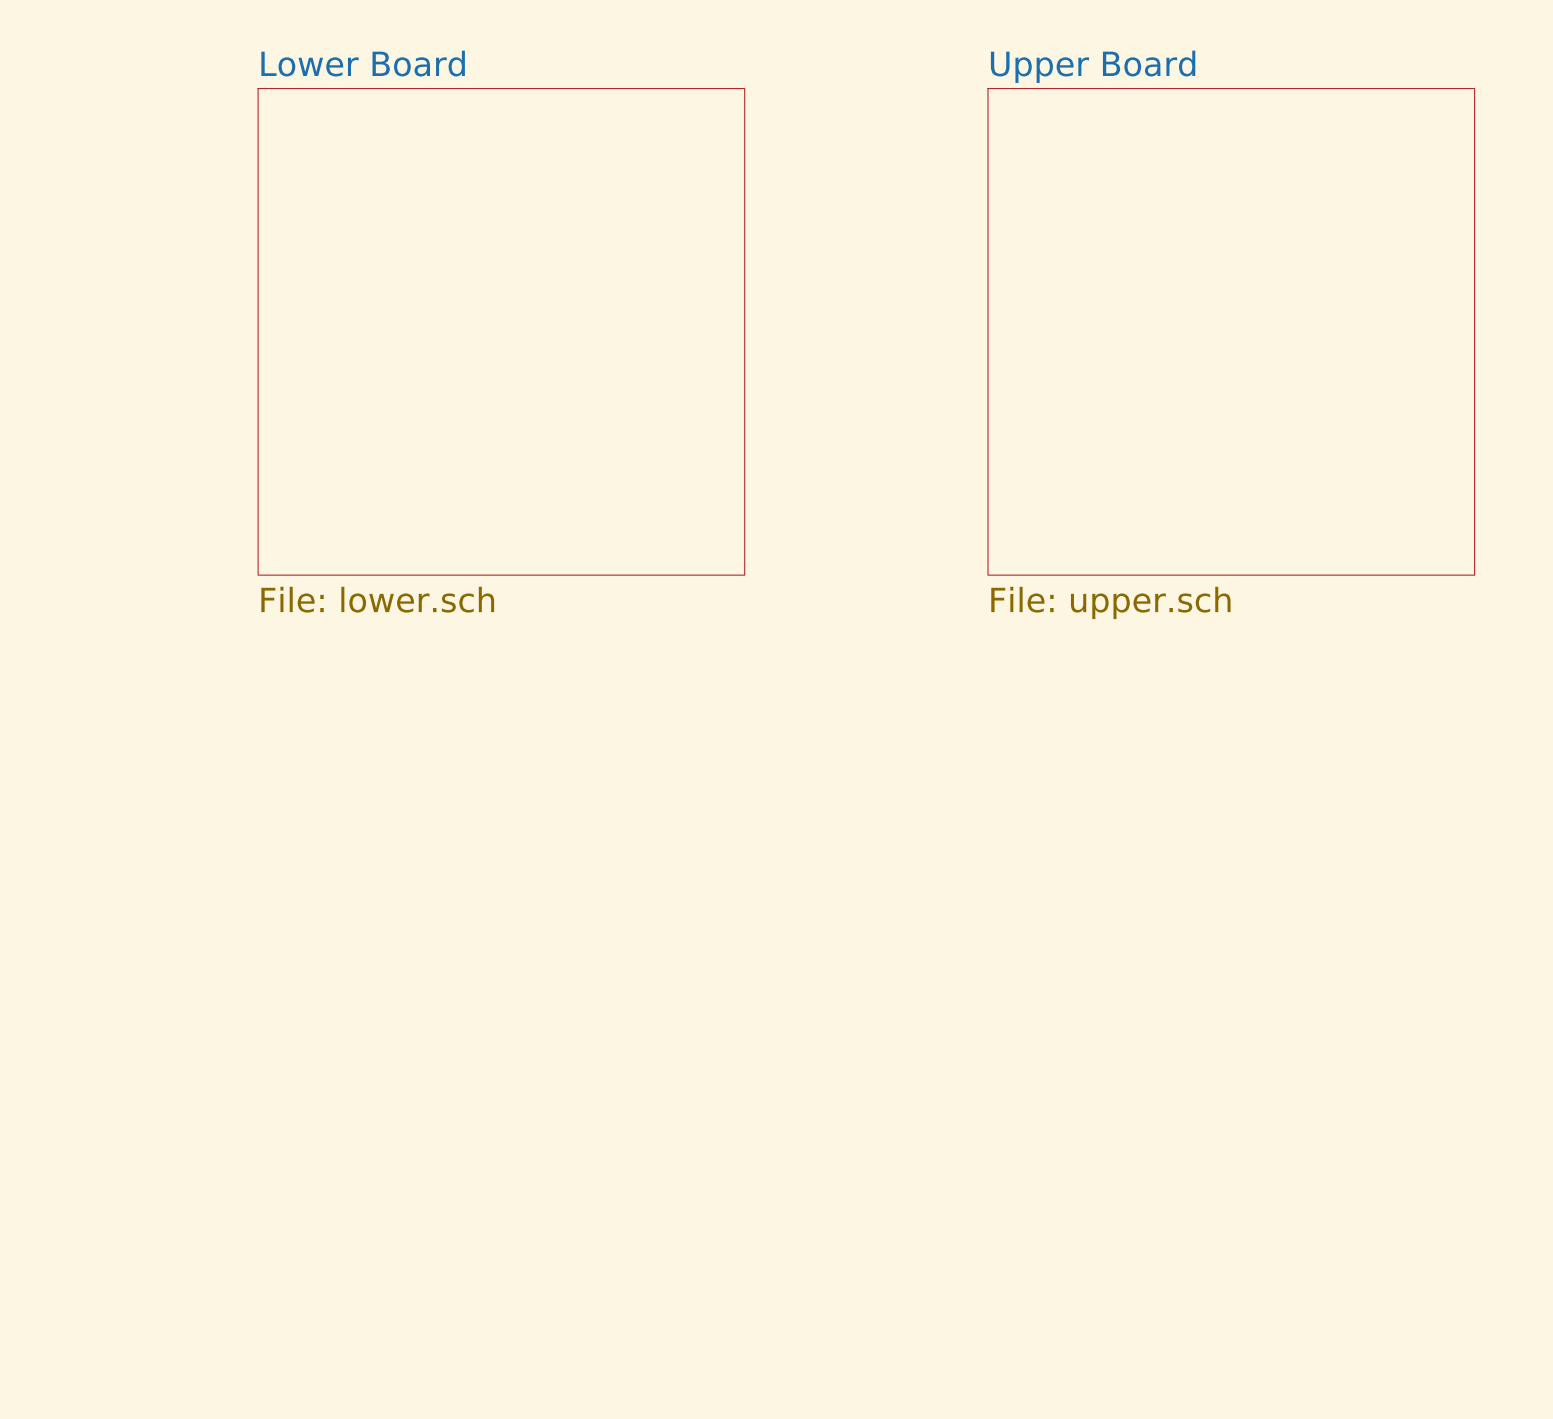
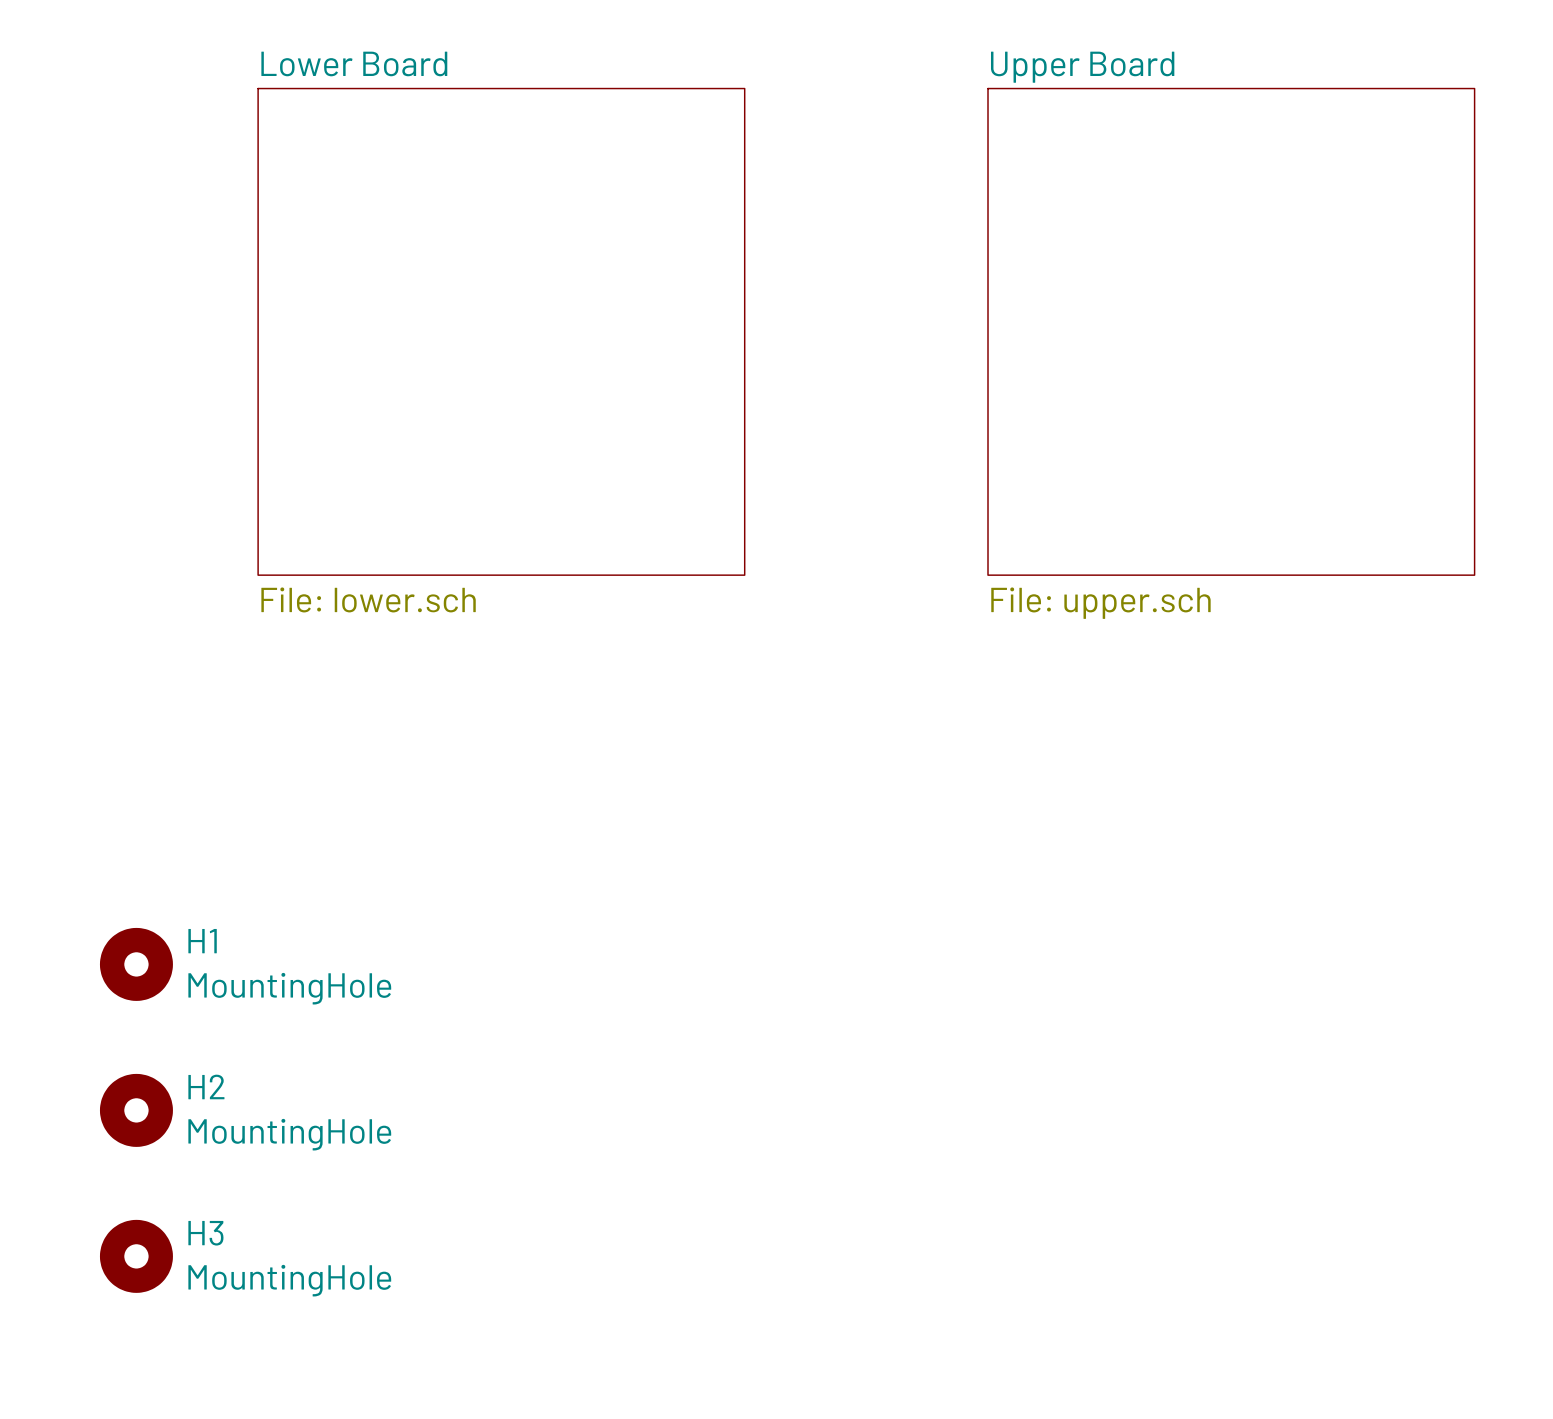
H1: none -> MountingHole (136, 964)
H2: none -> MountingHole (136, 1110)
H3: none -> MountingHole (136, 1256)

